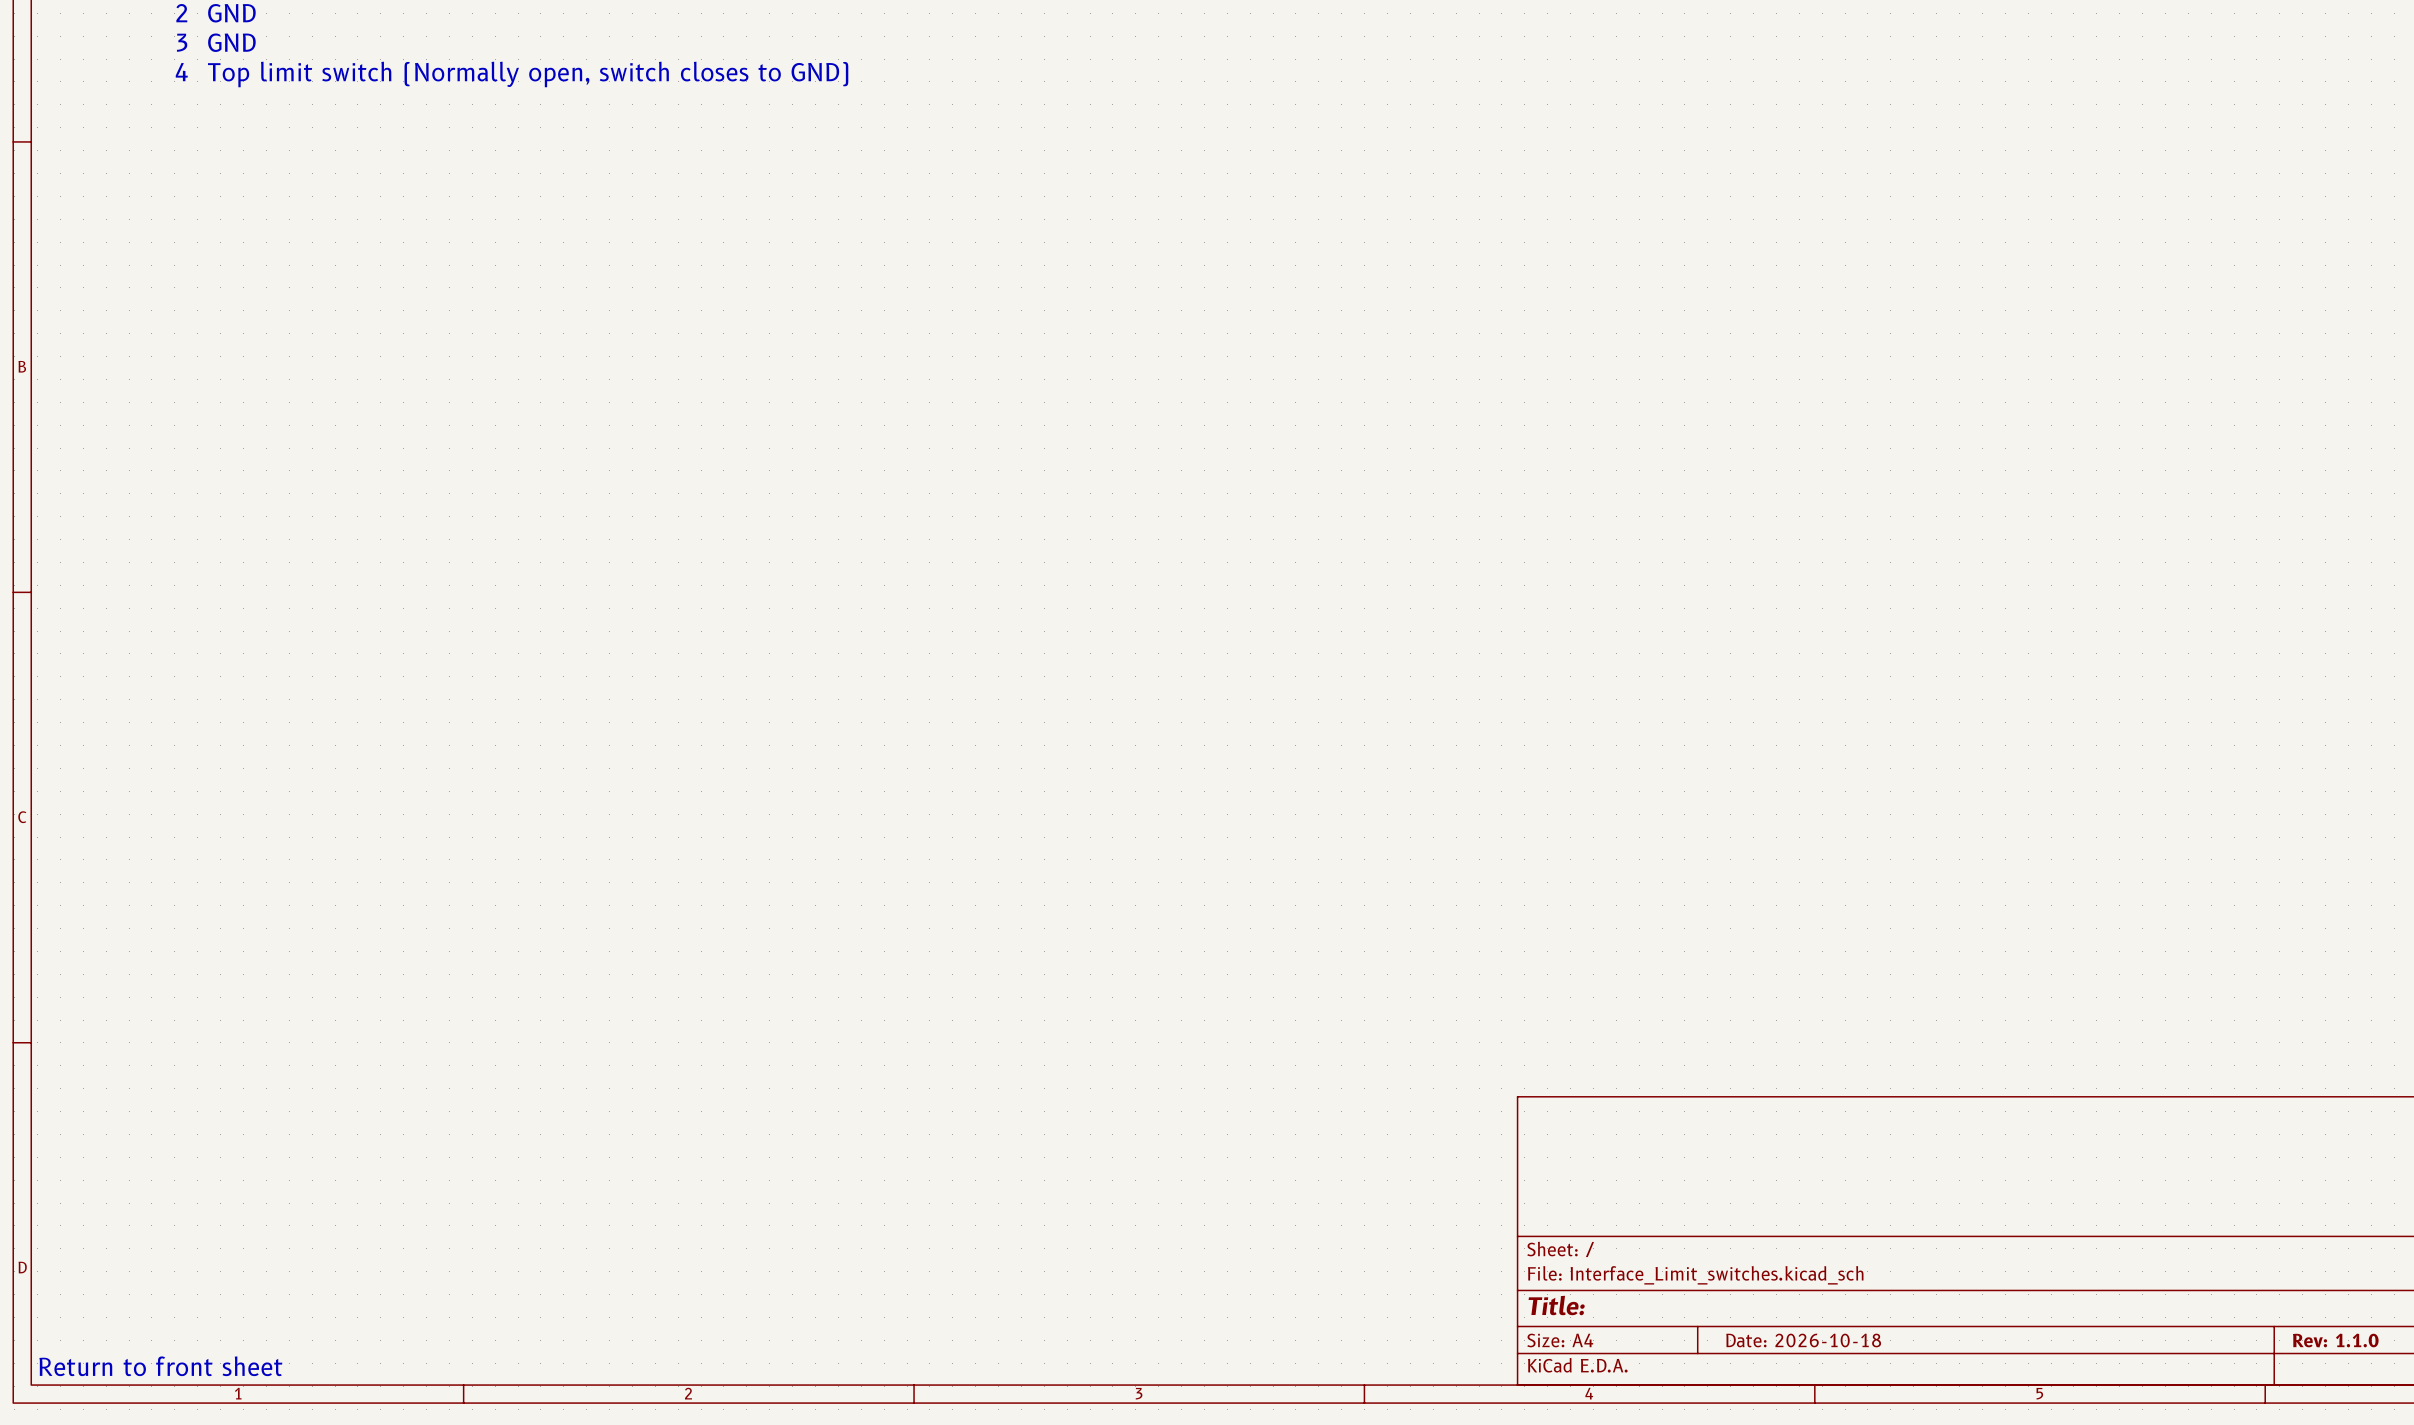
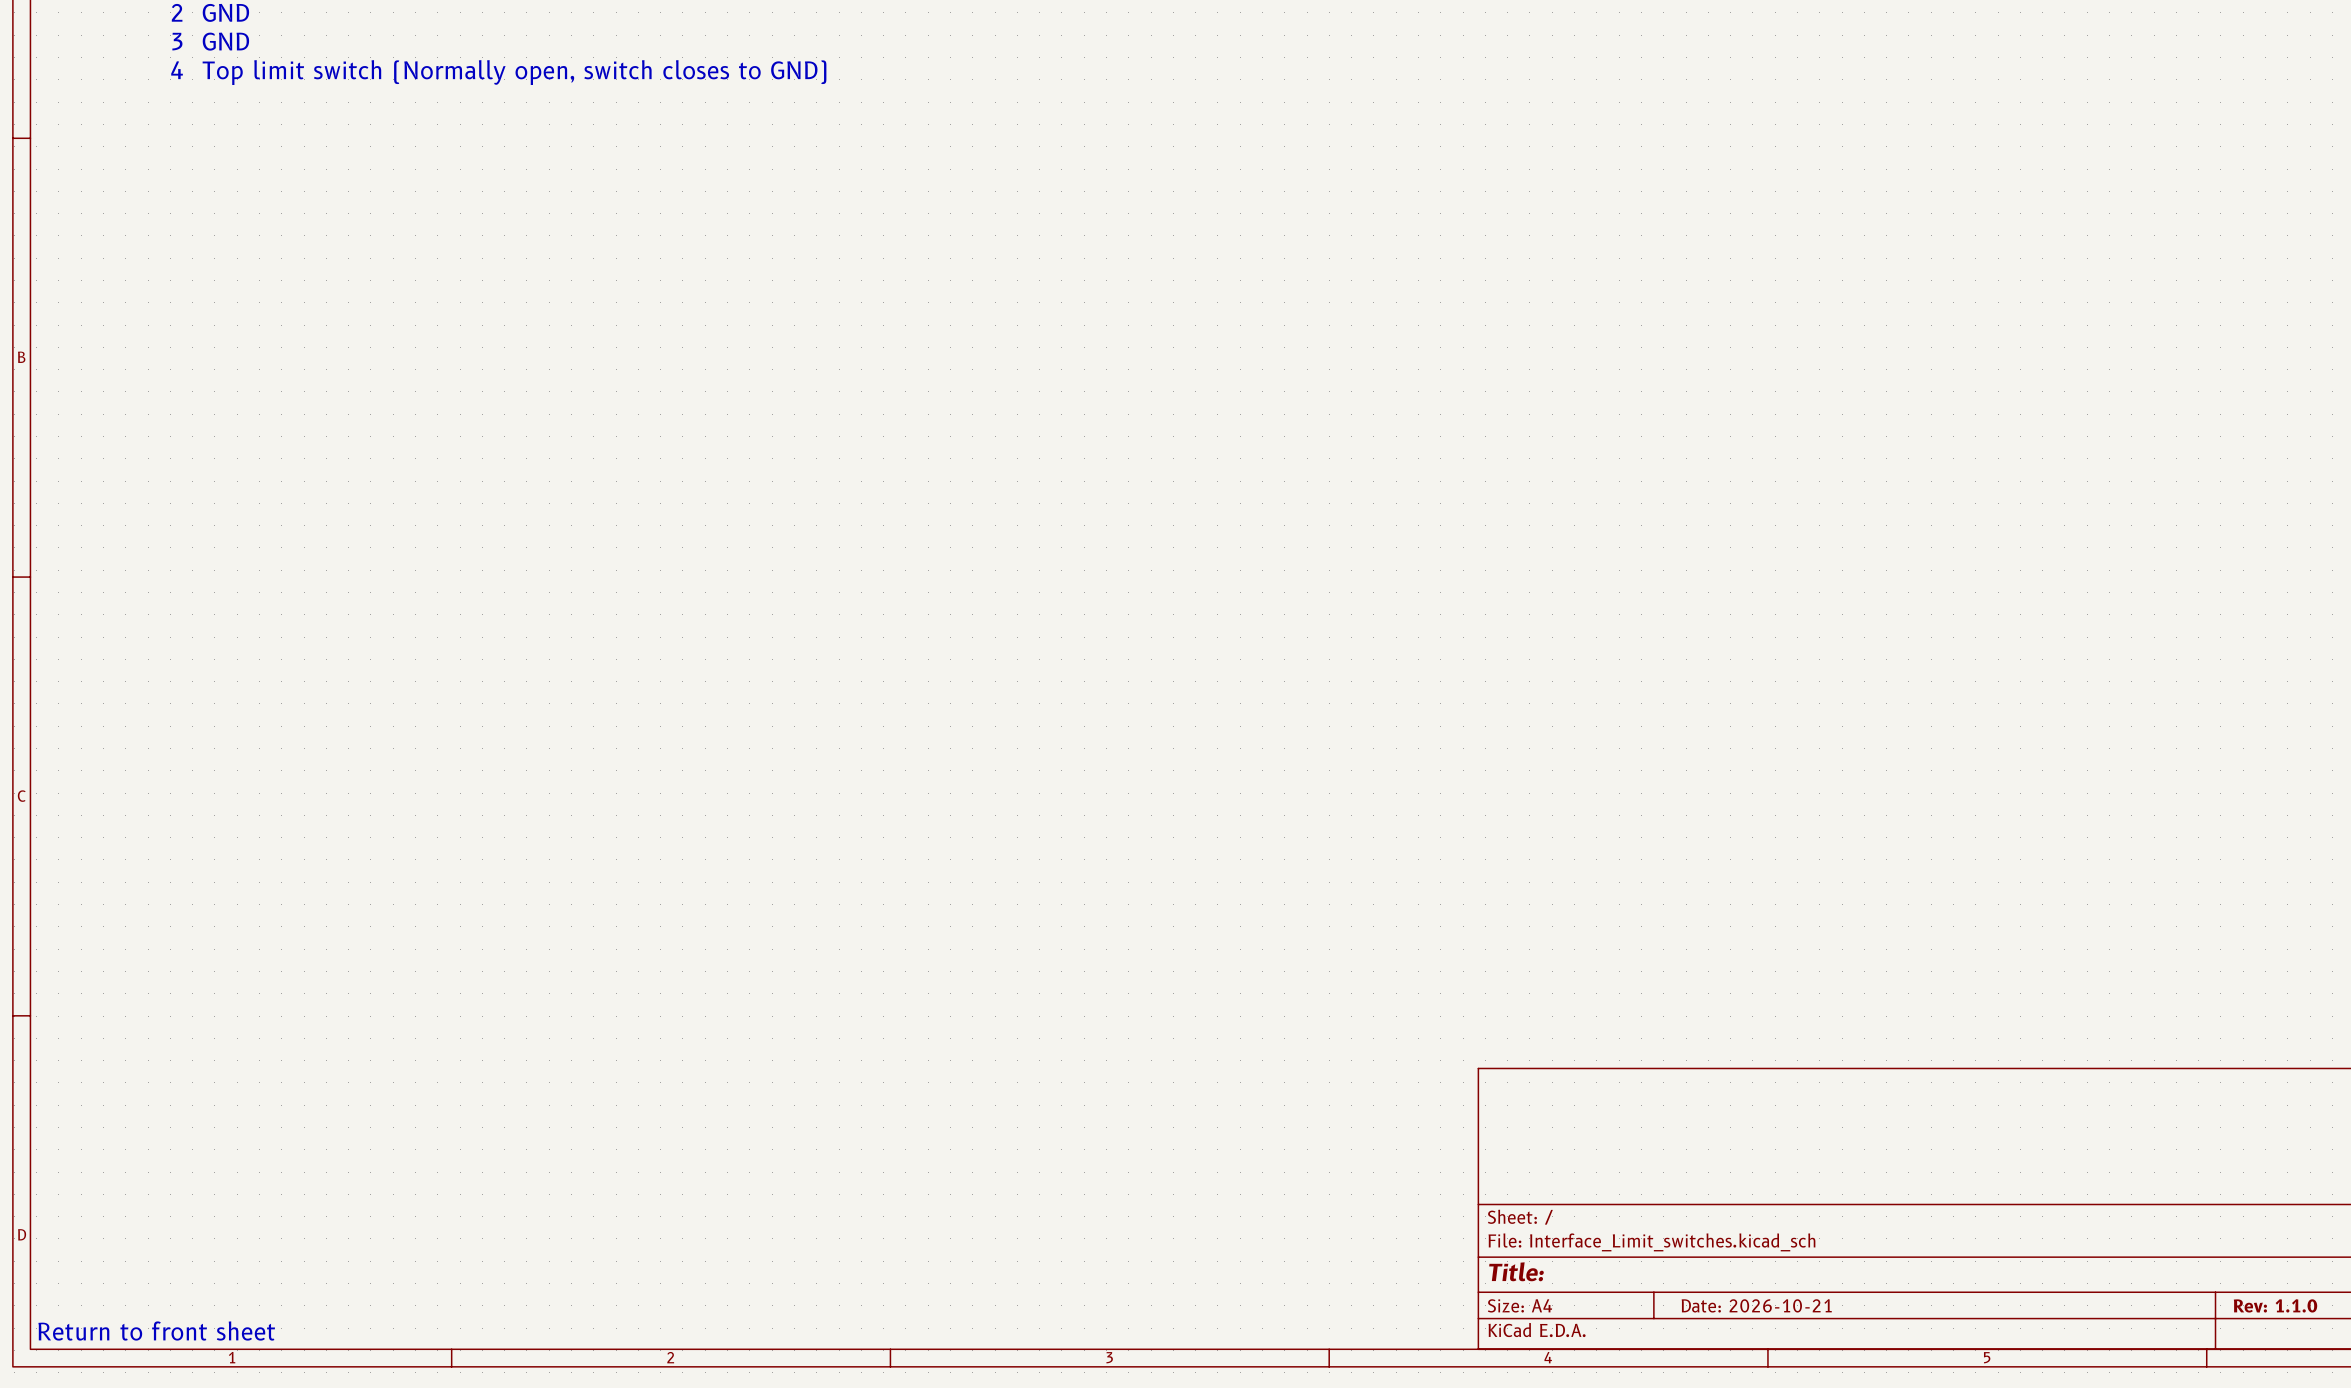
title block: Date: 2026-10-18 (1803, 1340) -> Date: 2026-10-21 (1756, 1305)

